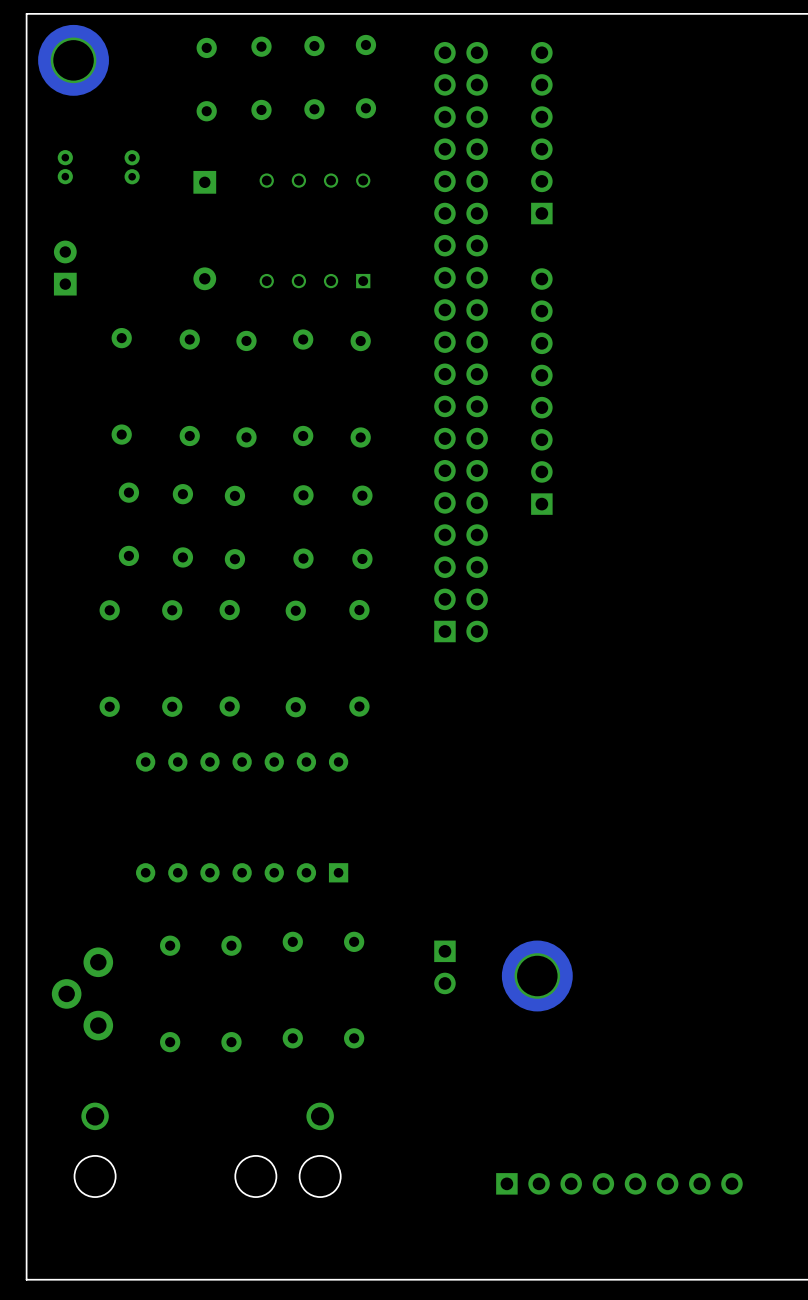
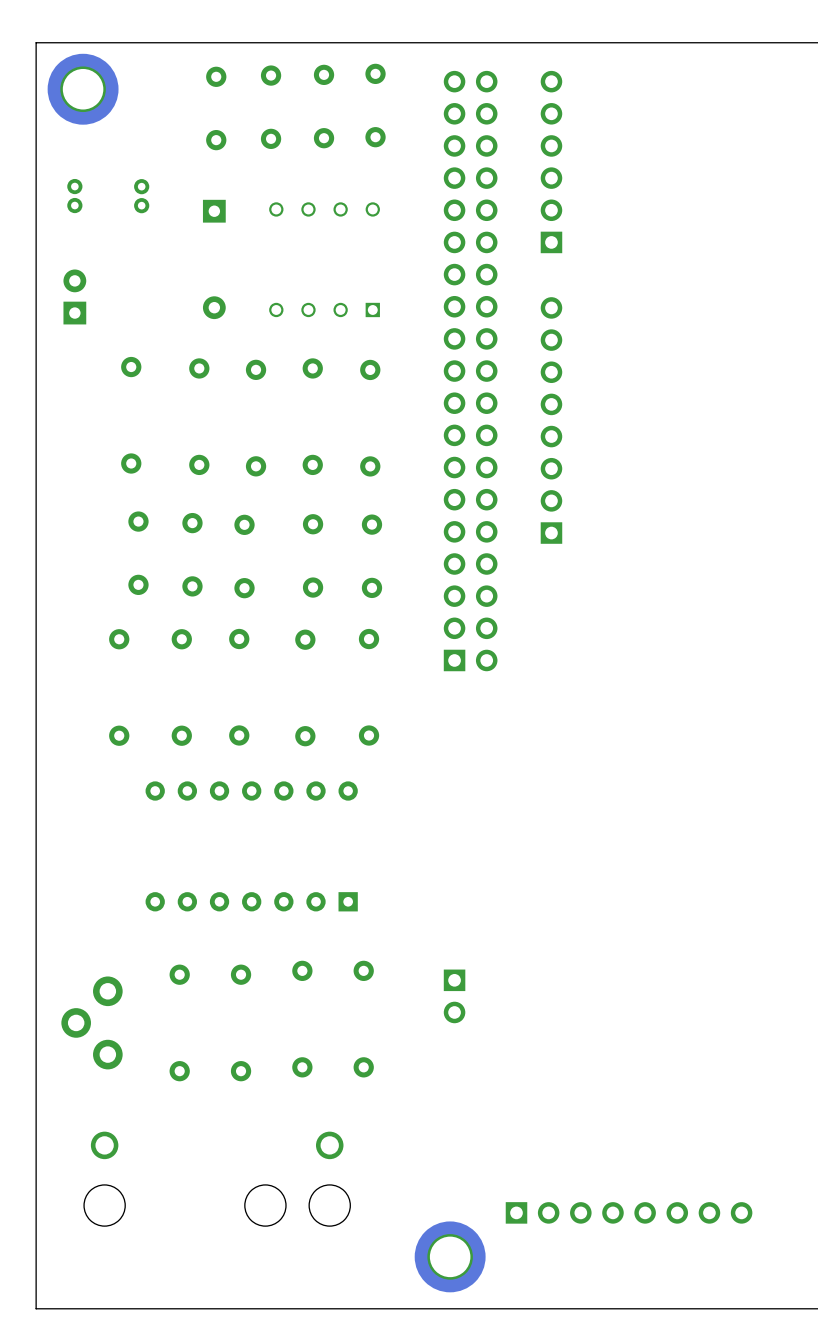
part: (537, 976) -> none
part: none -> (450, 1256)

